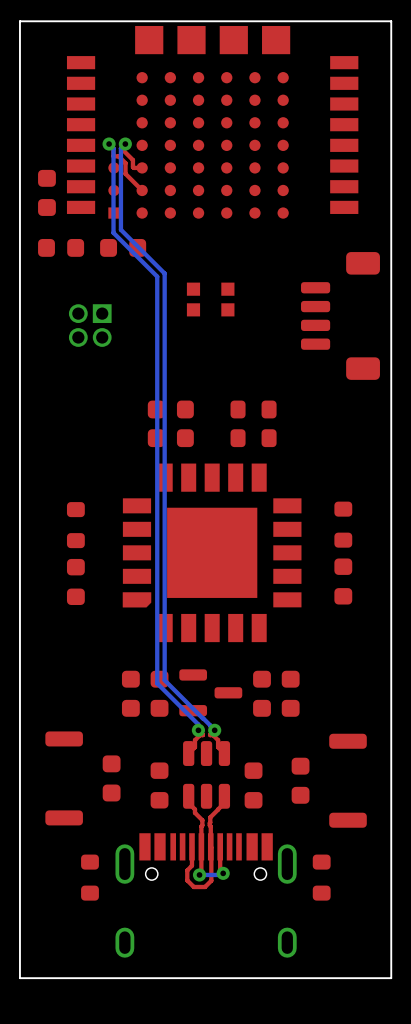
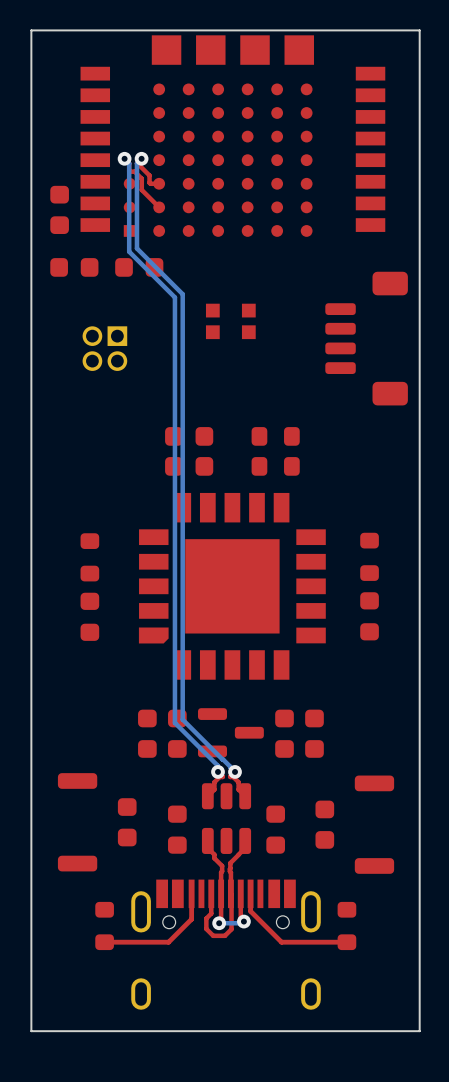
top track: none -> (191, 893) (191, 919) (168, 942) (104, 942)
top track: none -> (250, 893) (250, 911) (281, 942) (346, 942)

